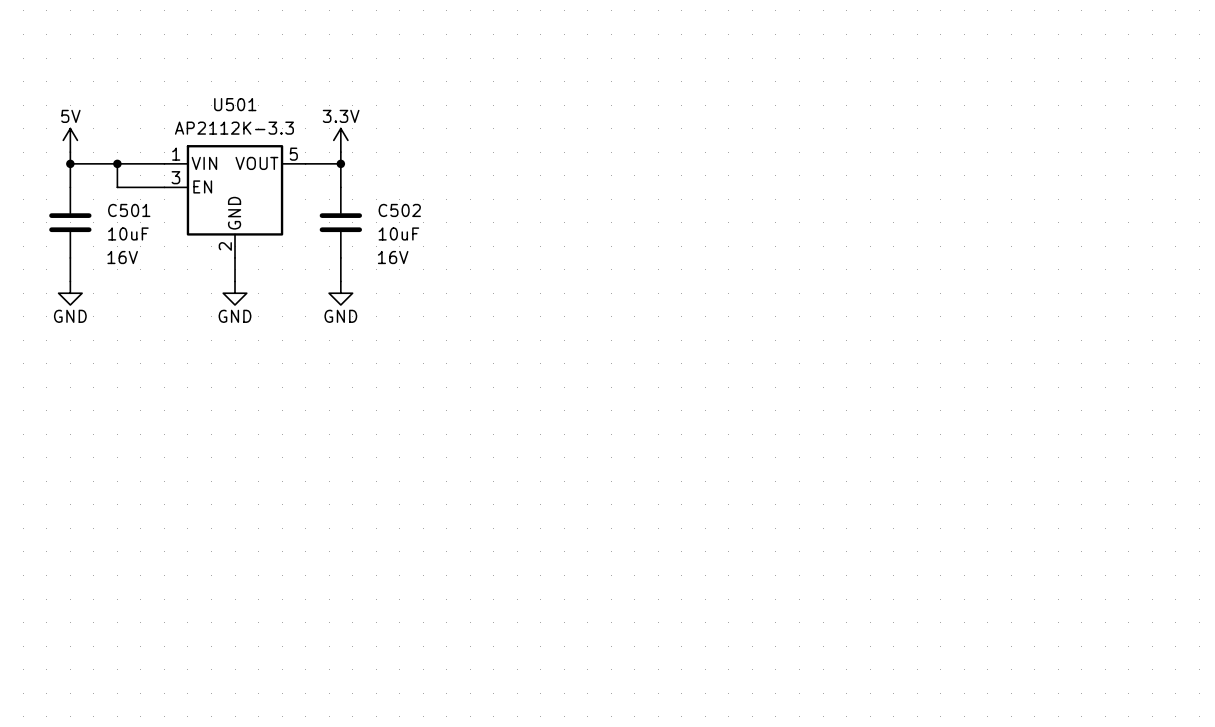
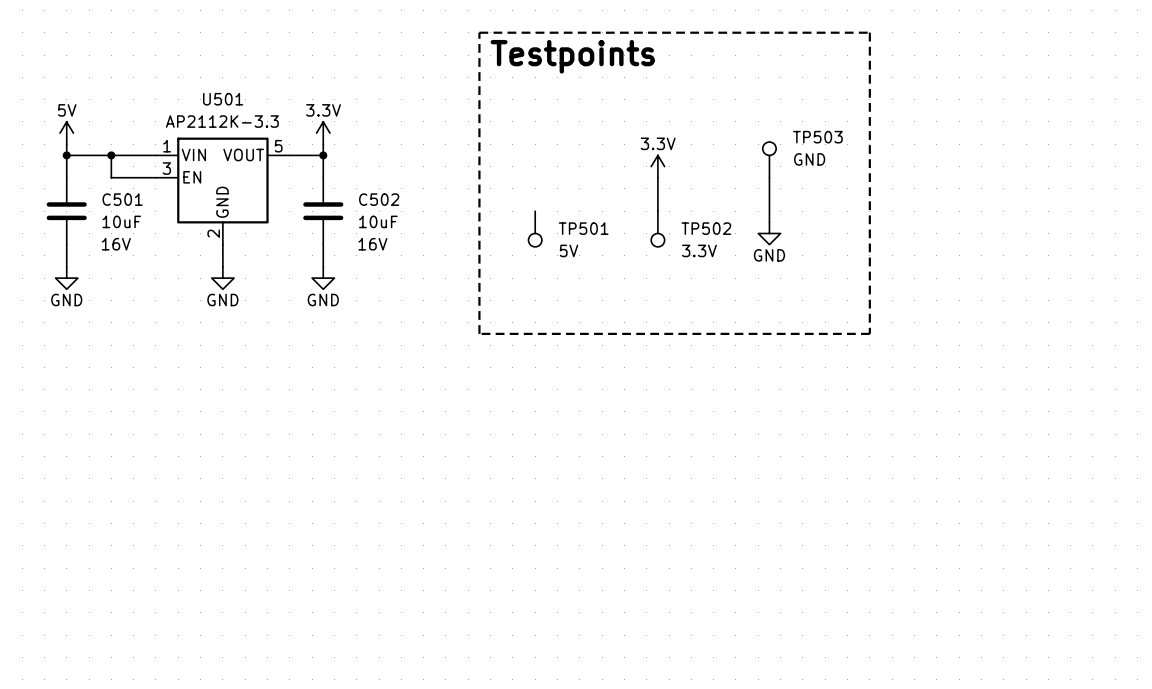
line: none -> (479, 32) (869, 32) (869, 333) (479, 333) (479, 32)
text: none -> Testpoints (572, 56)
TP503: none -> GND (769, 159)
power symbol: none -> 3.3V (657, 166)
wire: none -> (657, 177) (657, 211)
wire: none -> (769, 177) (769, 222)
TP501: none -> 5V (535, 229)
TP502: none -> 3.3V (657, 229)
power symbol: none -> GND (769, 233)

